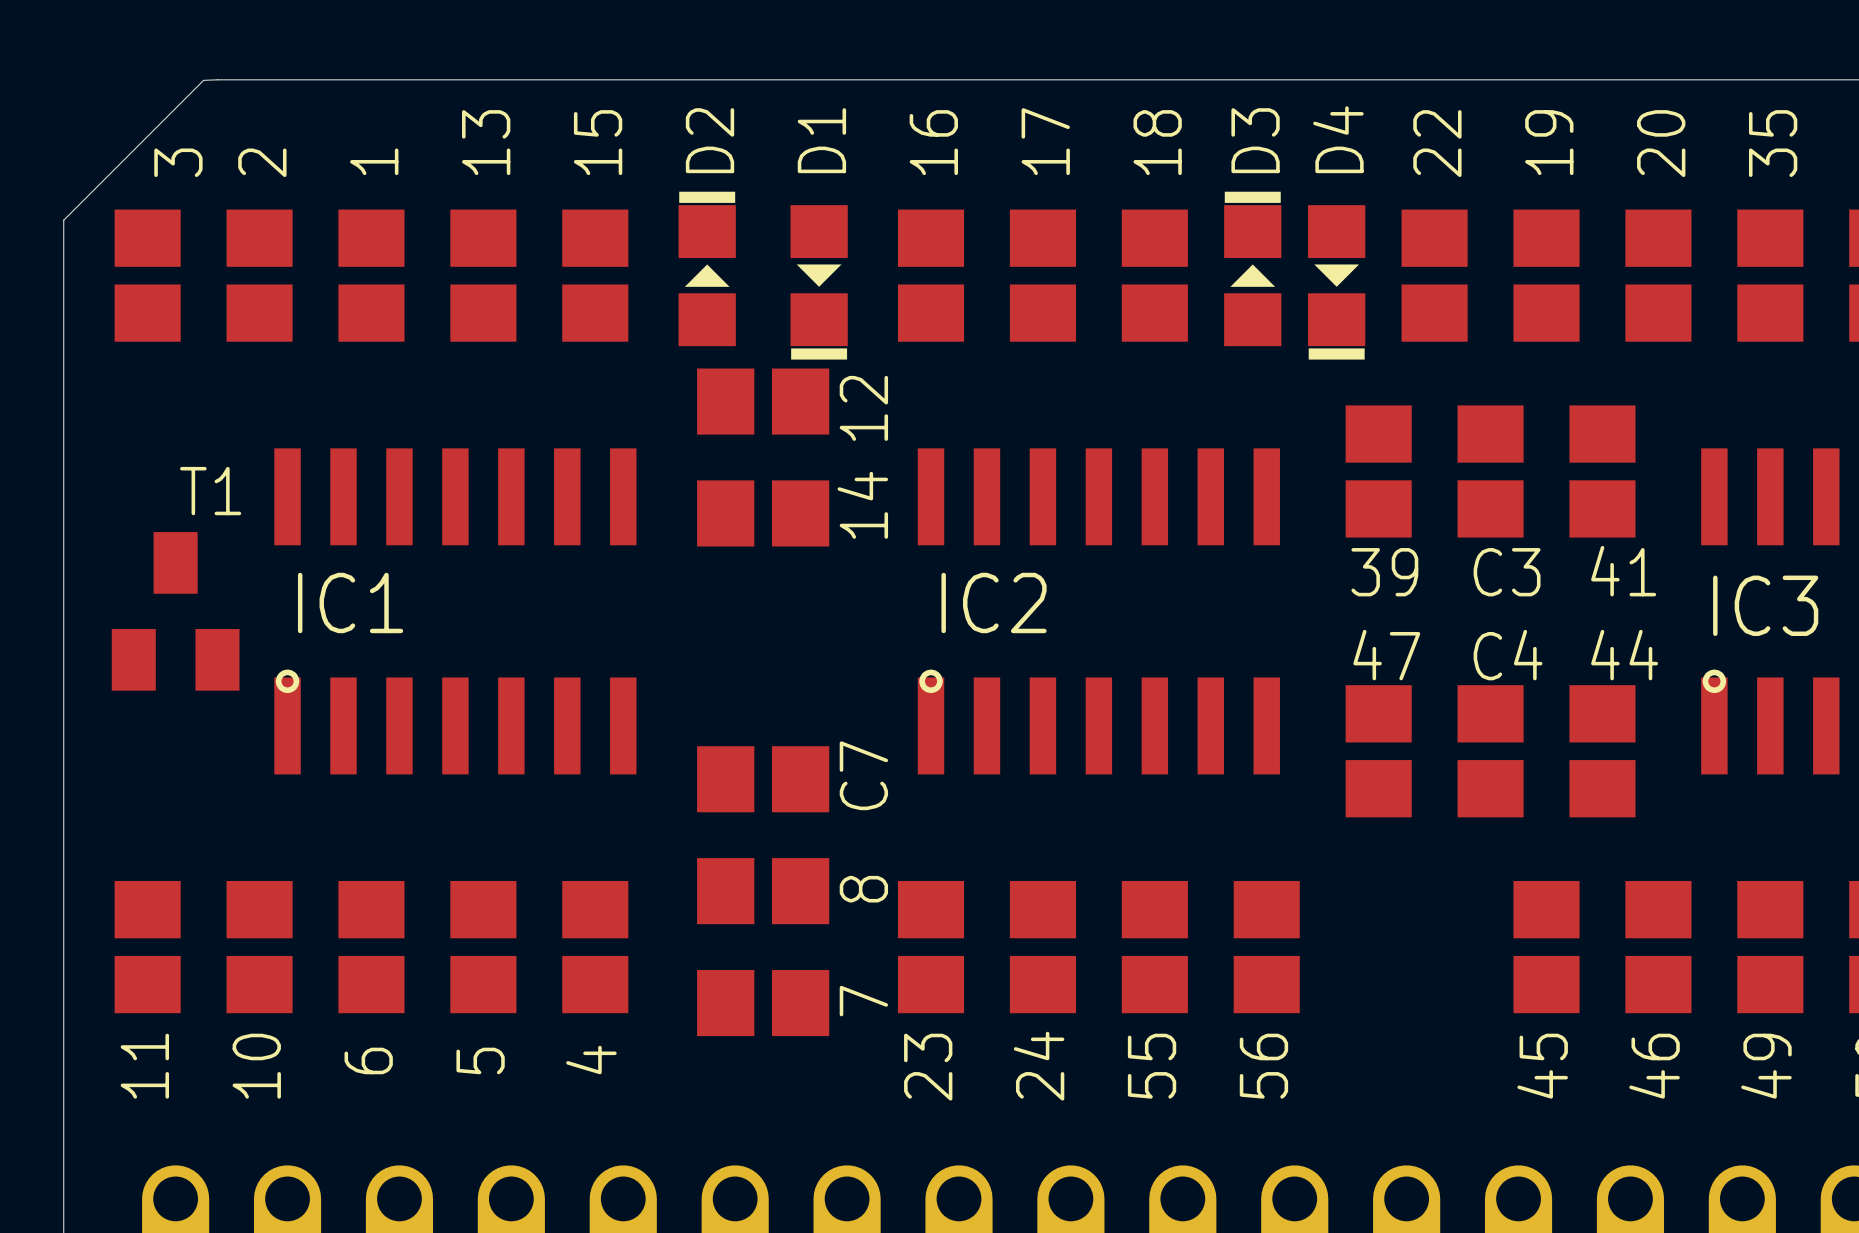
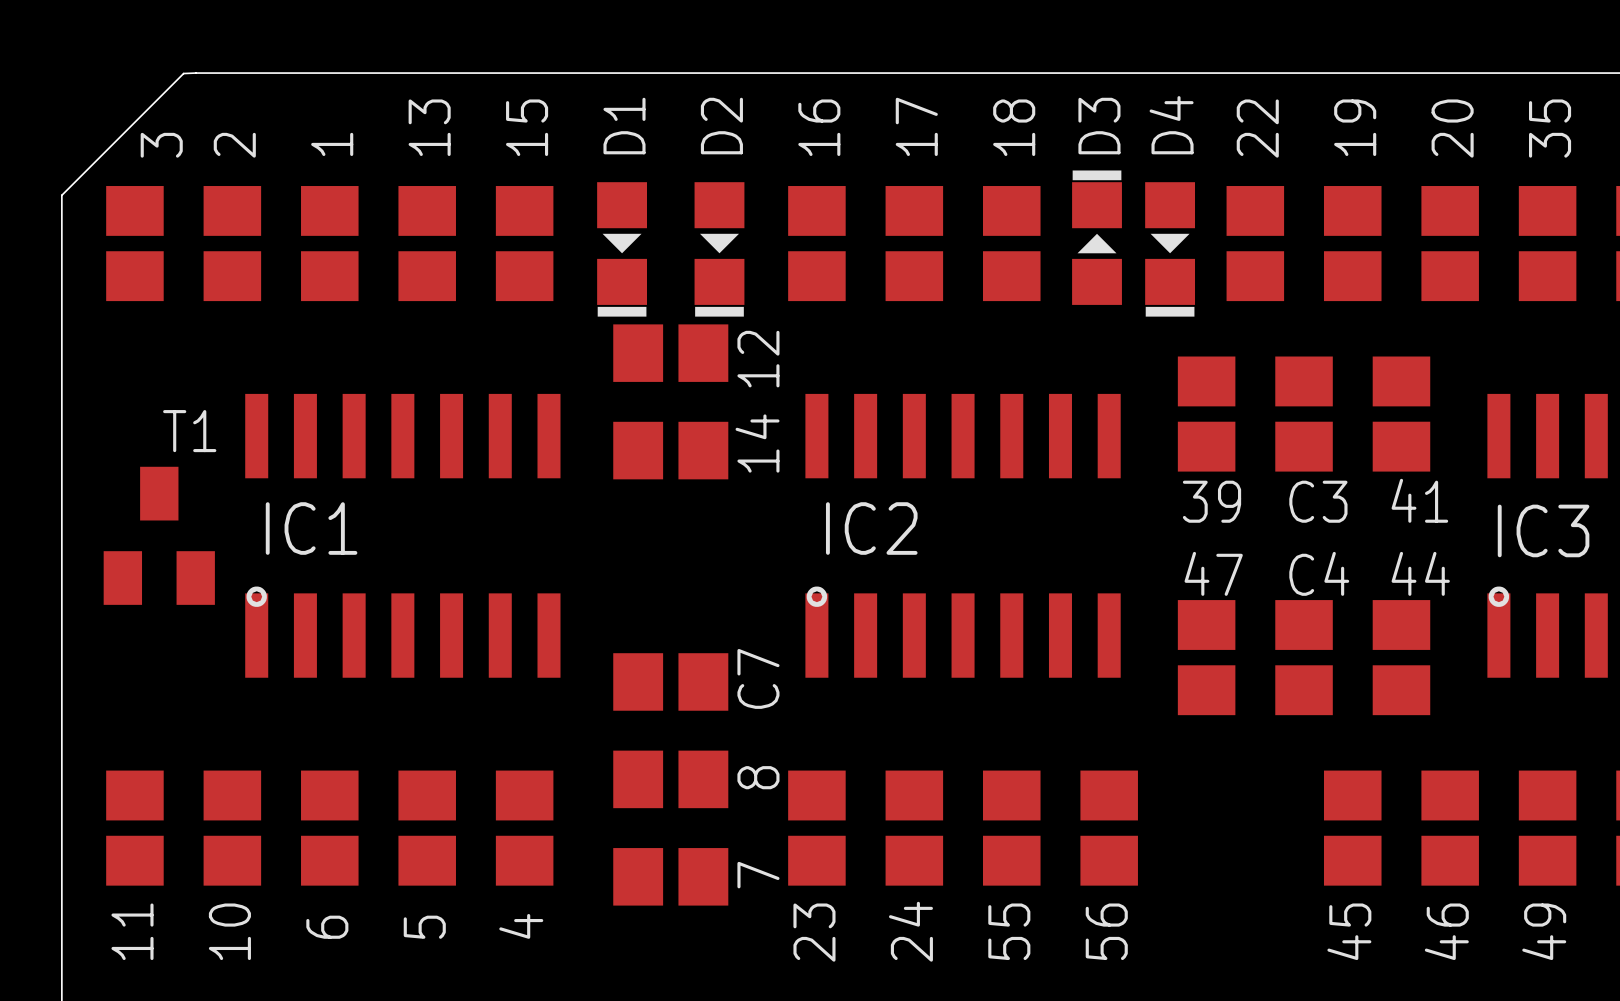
D1 name: D1 (821, 140) -> D2 (721, 126)
D2: (707, 268) -> none
D1: none -> (622, 249)

